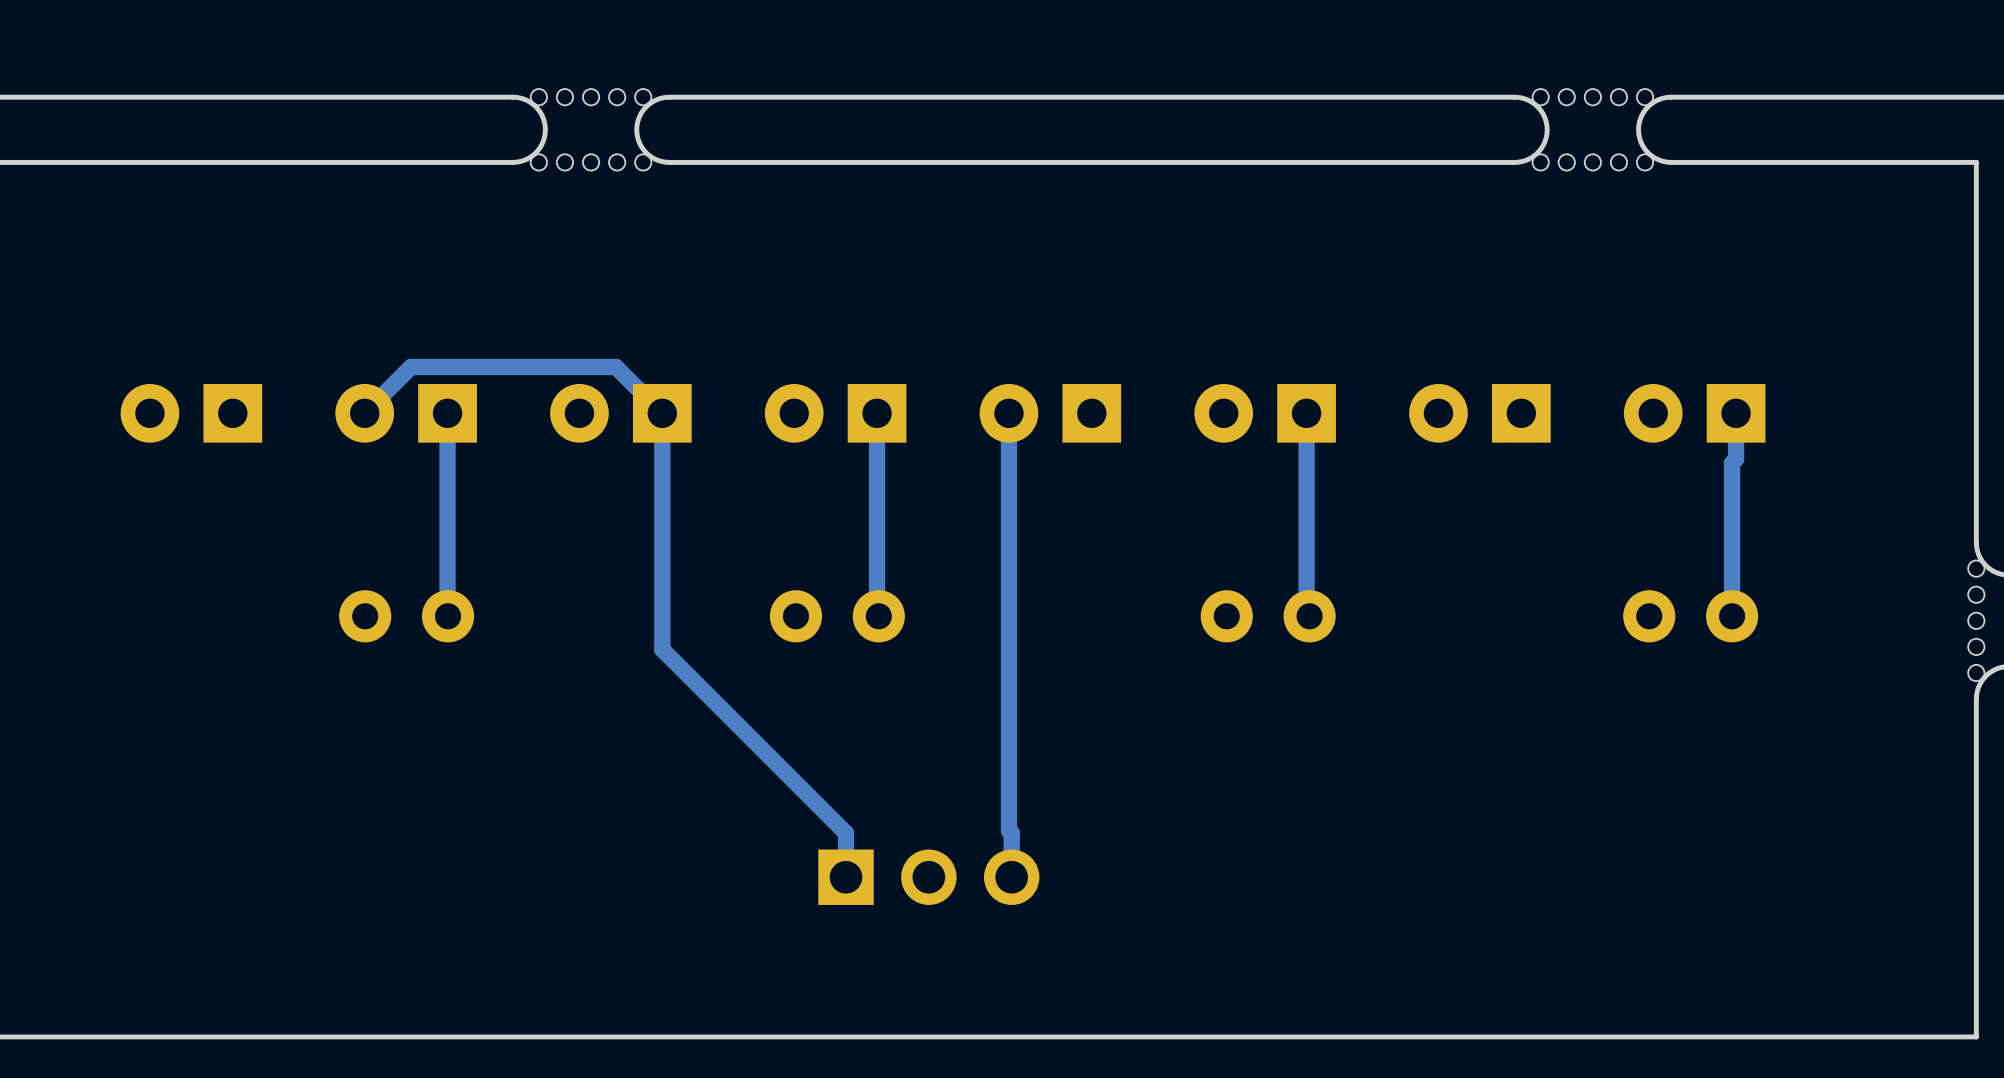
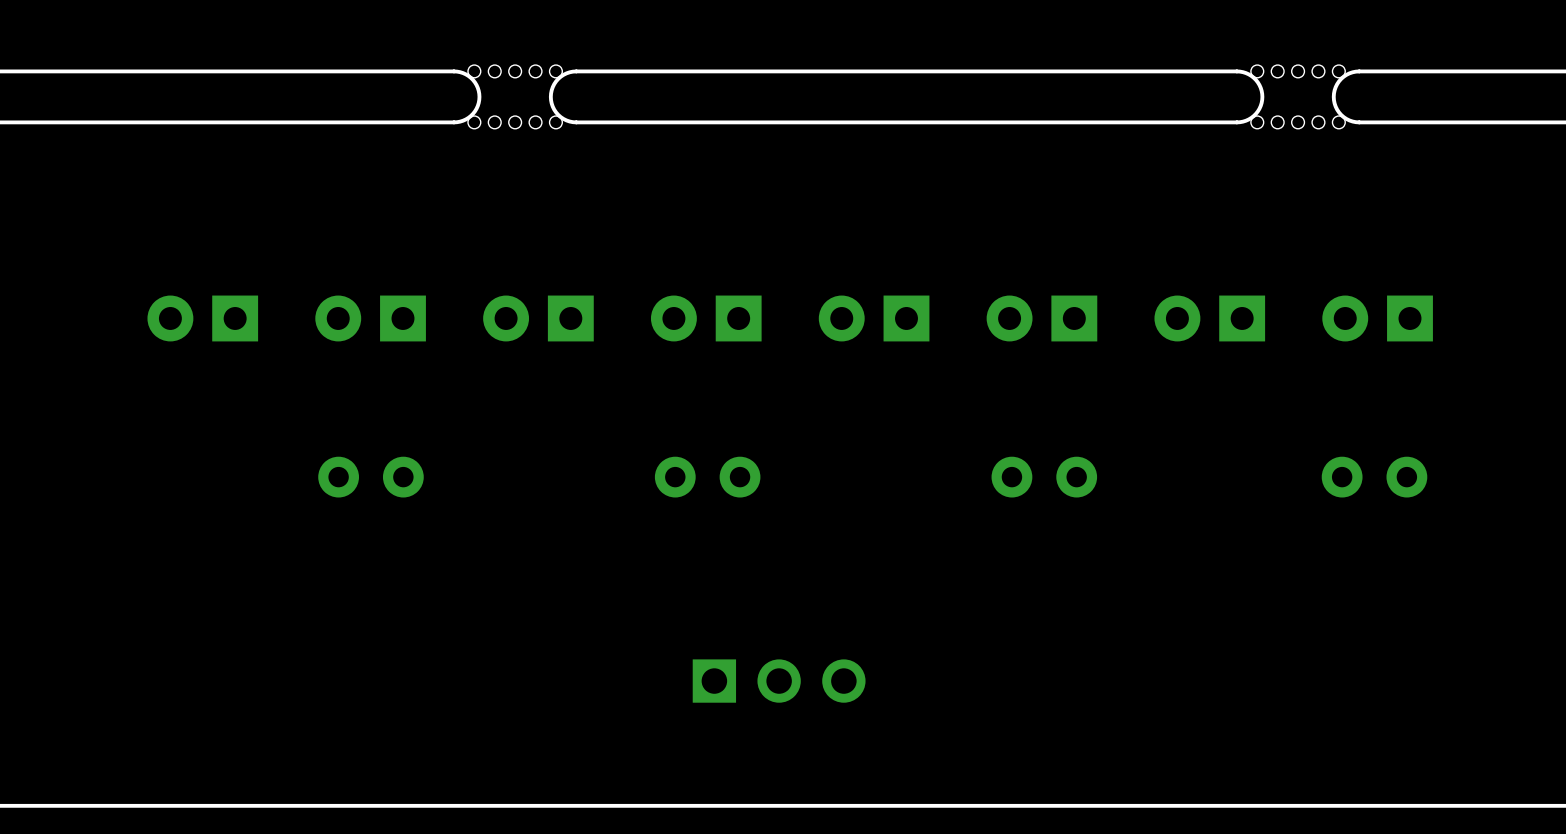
track: (364, 413) (411, 366) (615, 366) (662, 413) (662, 649) (846, 833) (846, 877) -> none
track: (447, 413) (448, 616) -> none
track: (877, 413) (877, 614) (878, 616) -> none
track: (1008, 413) (1008, 830) (1011, 833) (1011, 877) -> none
track: (1306, 413) (1306, 613) (1309, 616) -> none
track: (1736, 413) (1736, 459) (1732, 463) (1732, 616) -> none

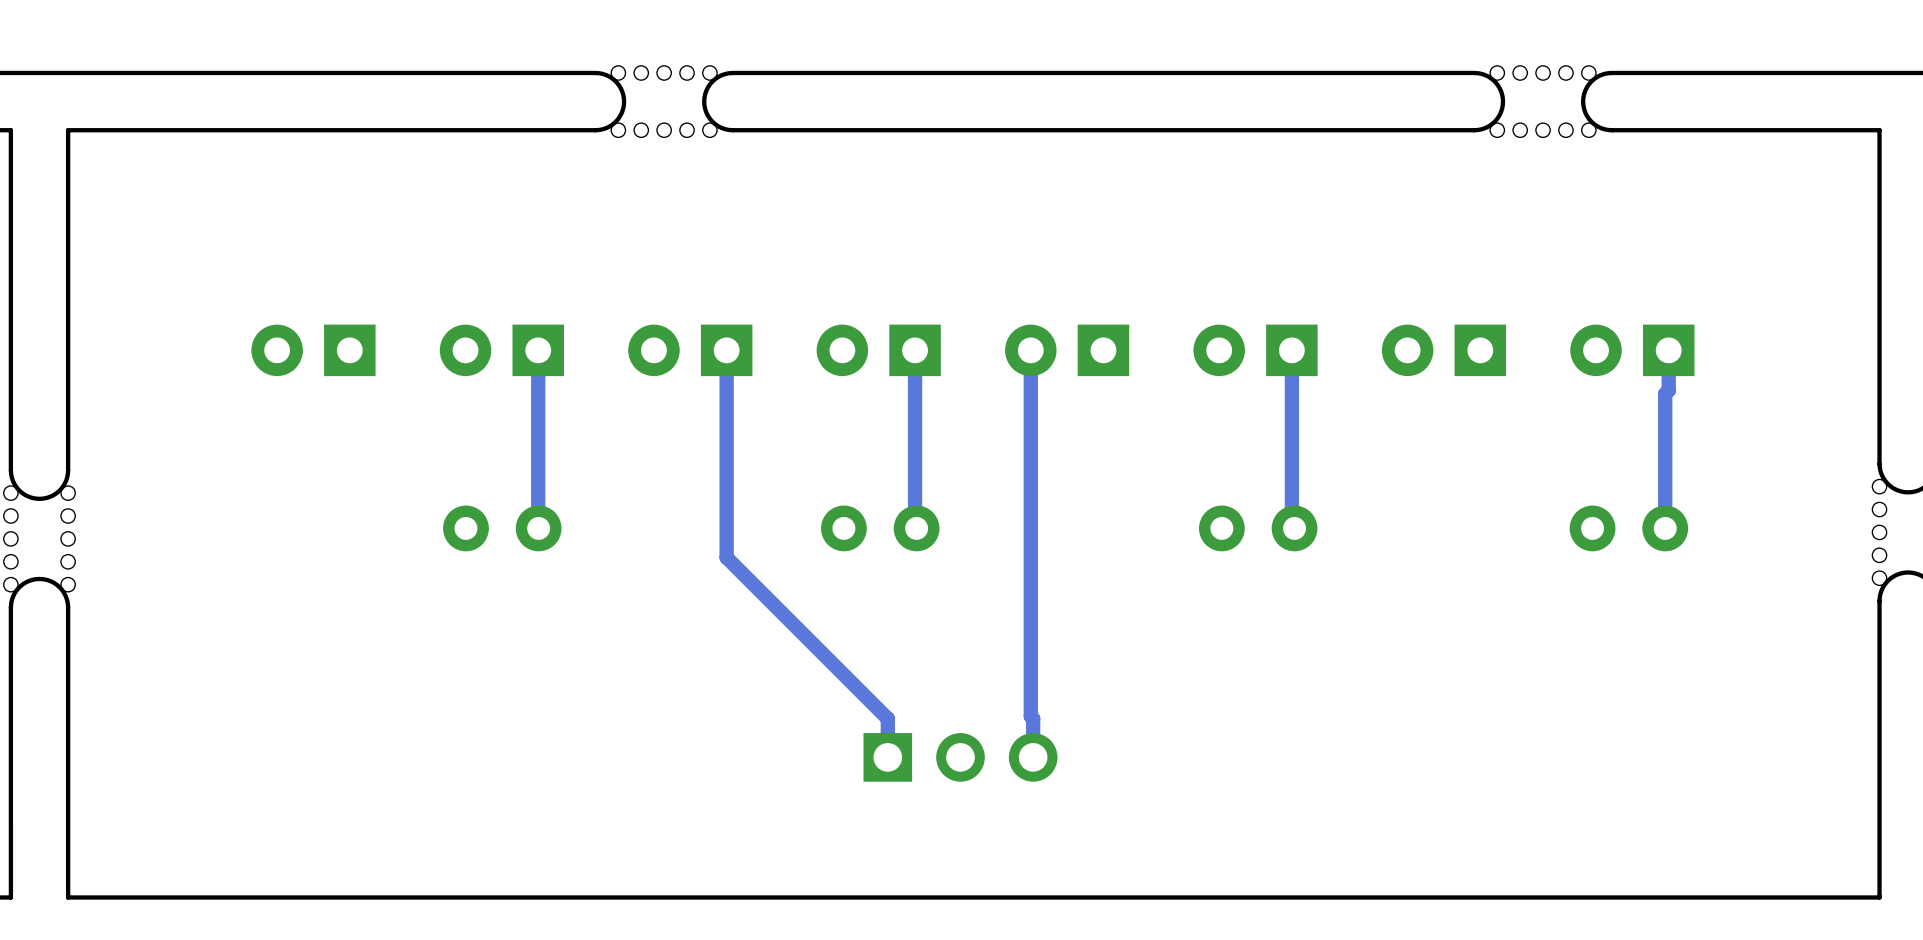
track: none -> (538, 350) (538, 528)
track: none -> (726, 350) (726, 557) (887, 718) (887, 757)
track: none -> (915, 350) (915, 526) (916, 528)
track: none -> (1030, 350) (1030, 716) (1033, 718) (1033, 757)
track: none -> (1291, 350) (1291, 525) (1294, 528)
track: none -> (1668, 350) (1668, 390) (1665, 393) (1665, 528)

